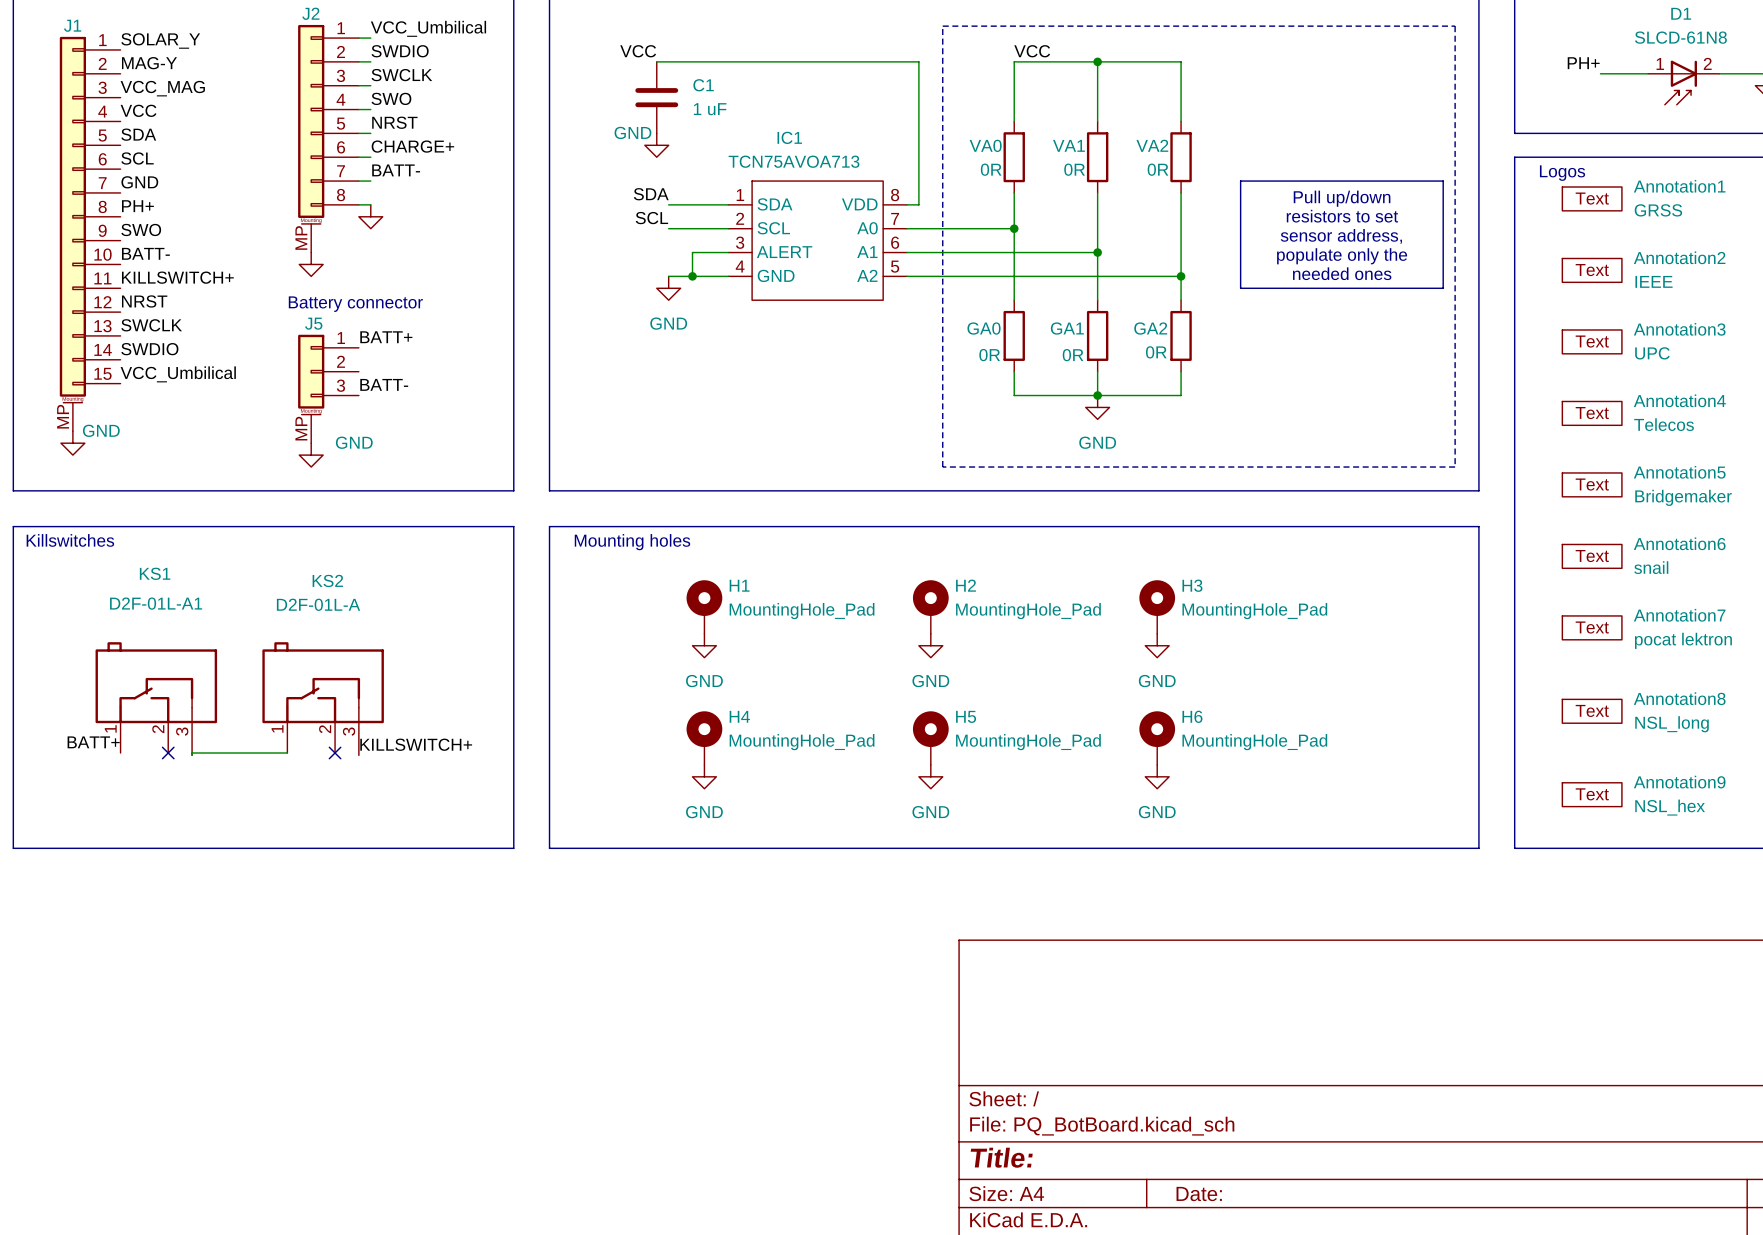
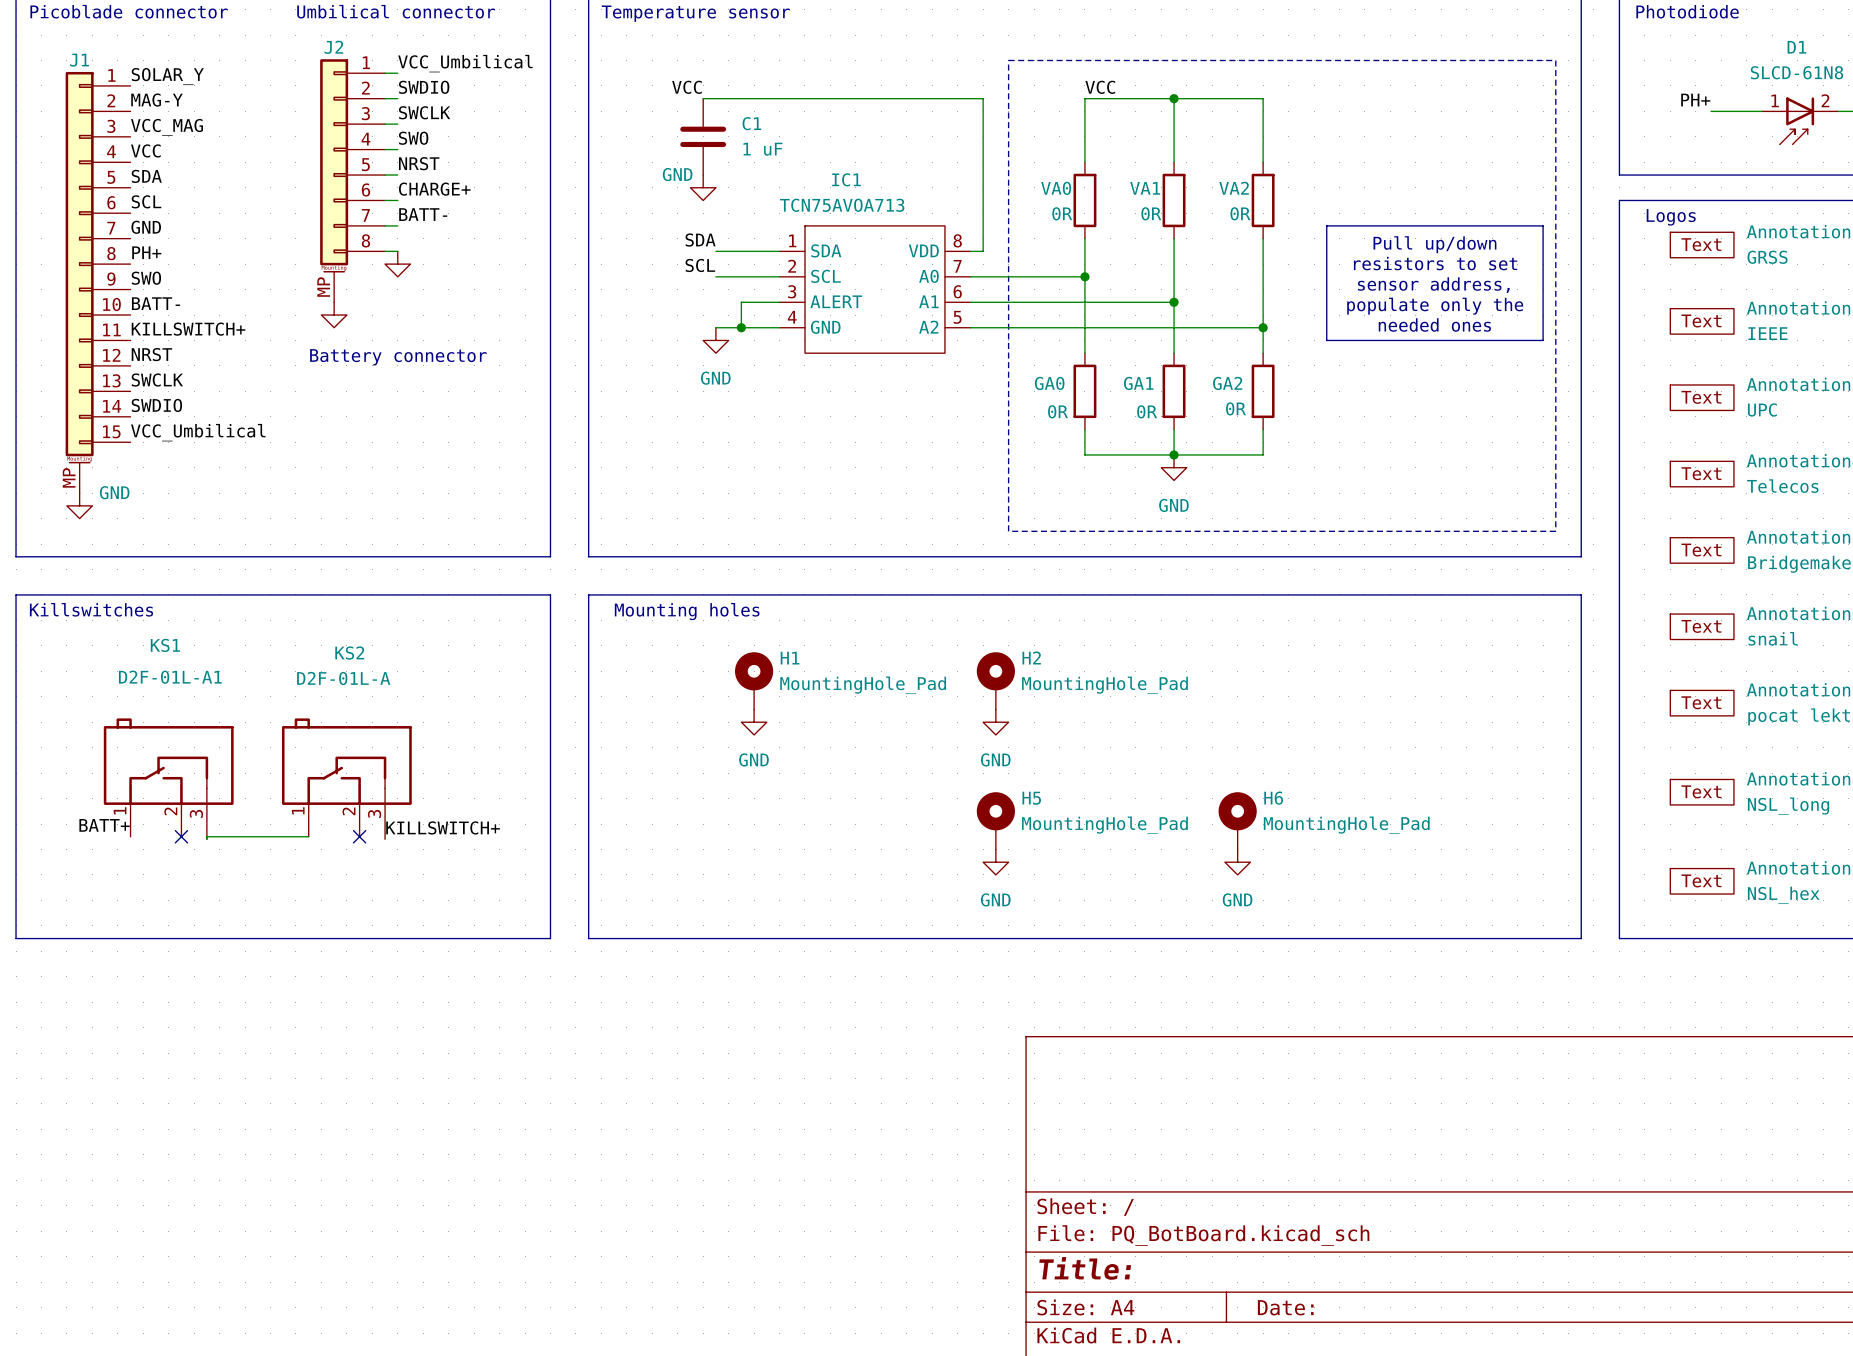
label: BATT+ (386, 337) -> none
label: BATT- (384, 384) -> none
J5: (328, 388) -> none
power symbol: GND (311, 455) -> none
H3: MountingHole_Pad (1157, 607) -> none
power symbol: GND (1157, 645) -> none
H4: MountingHole_Pad (704, 738) -> none
power symbol: GND (704, 776) -> none

